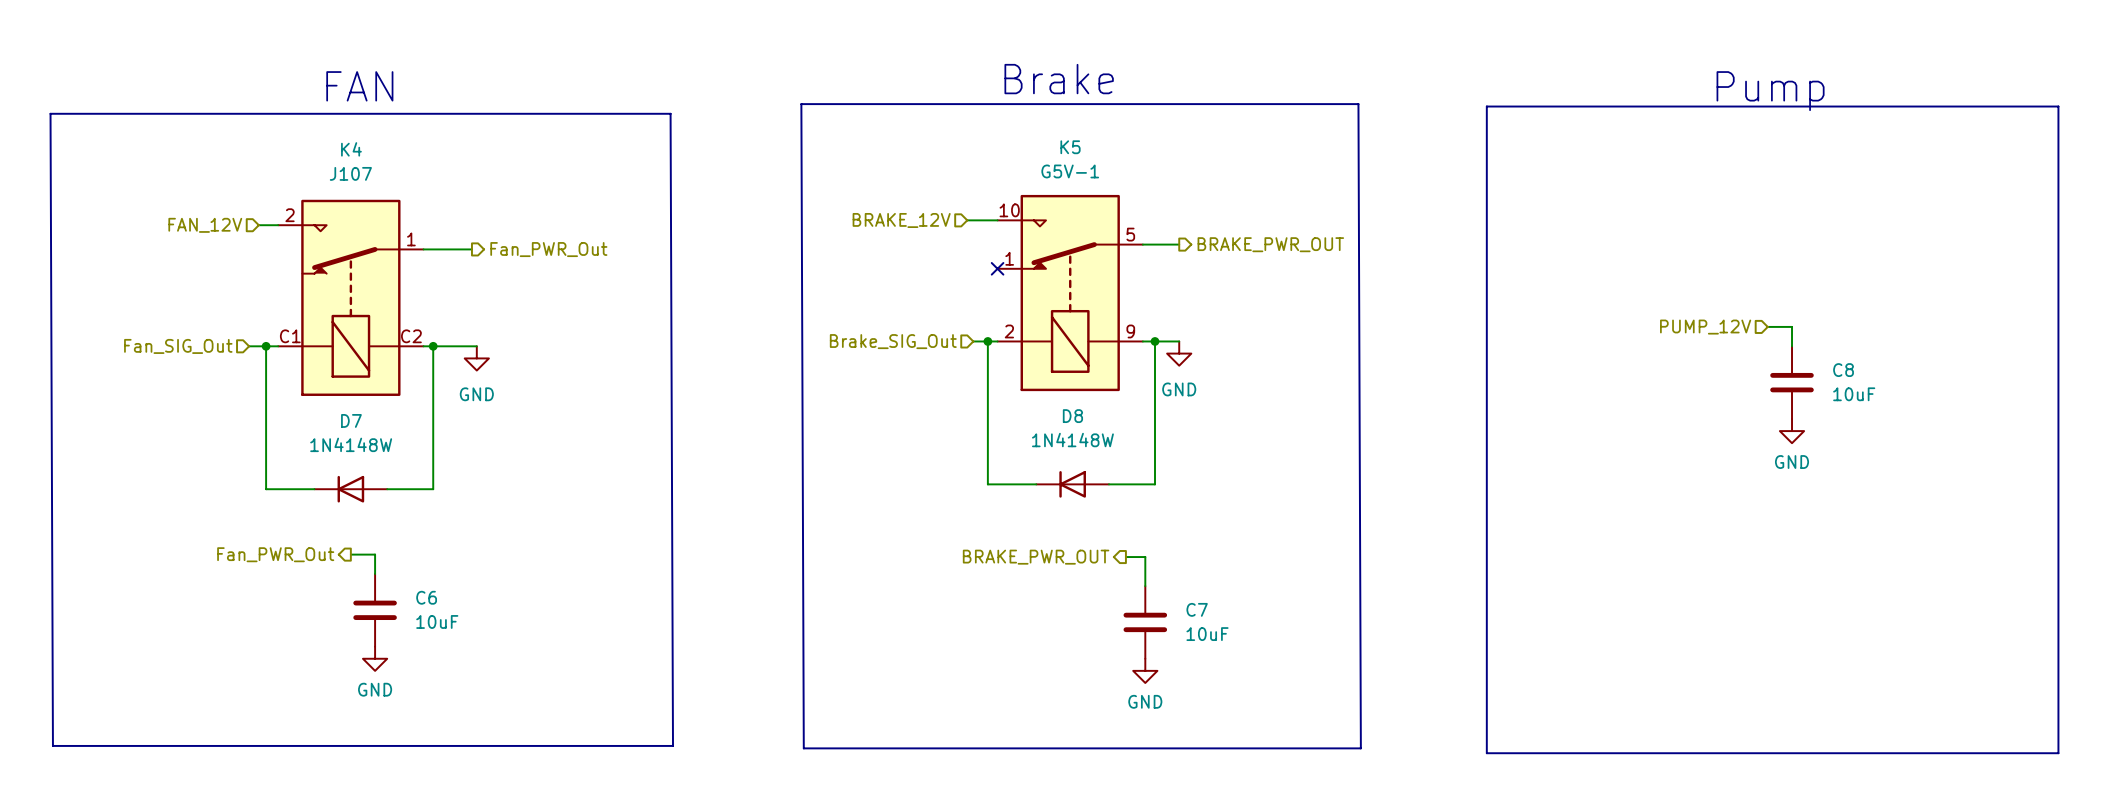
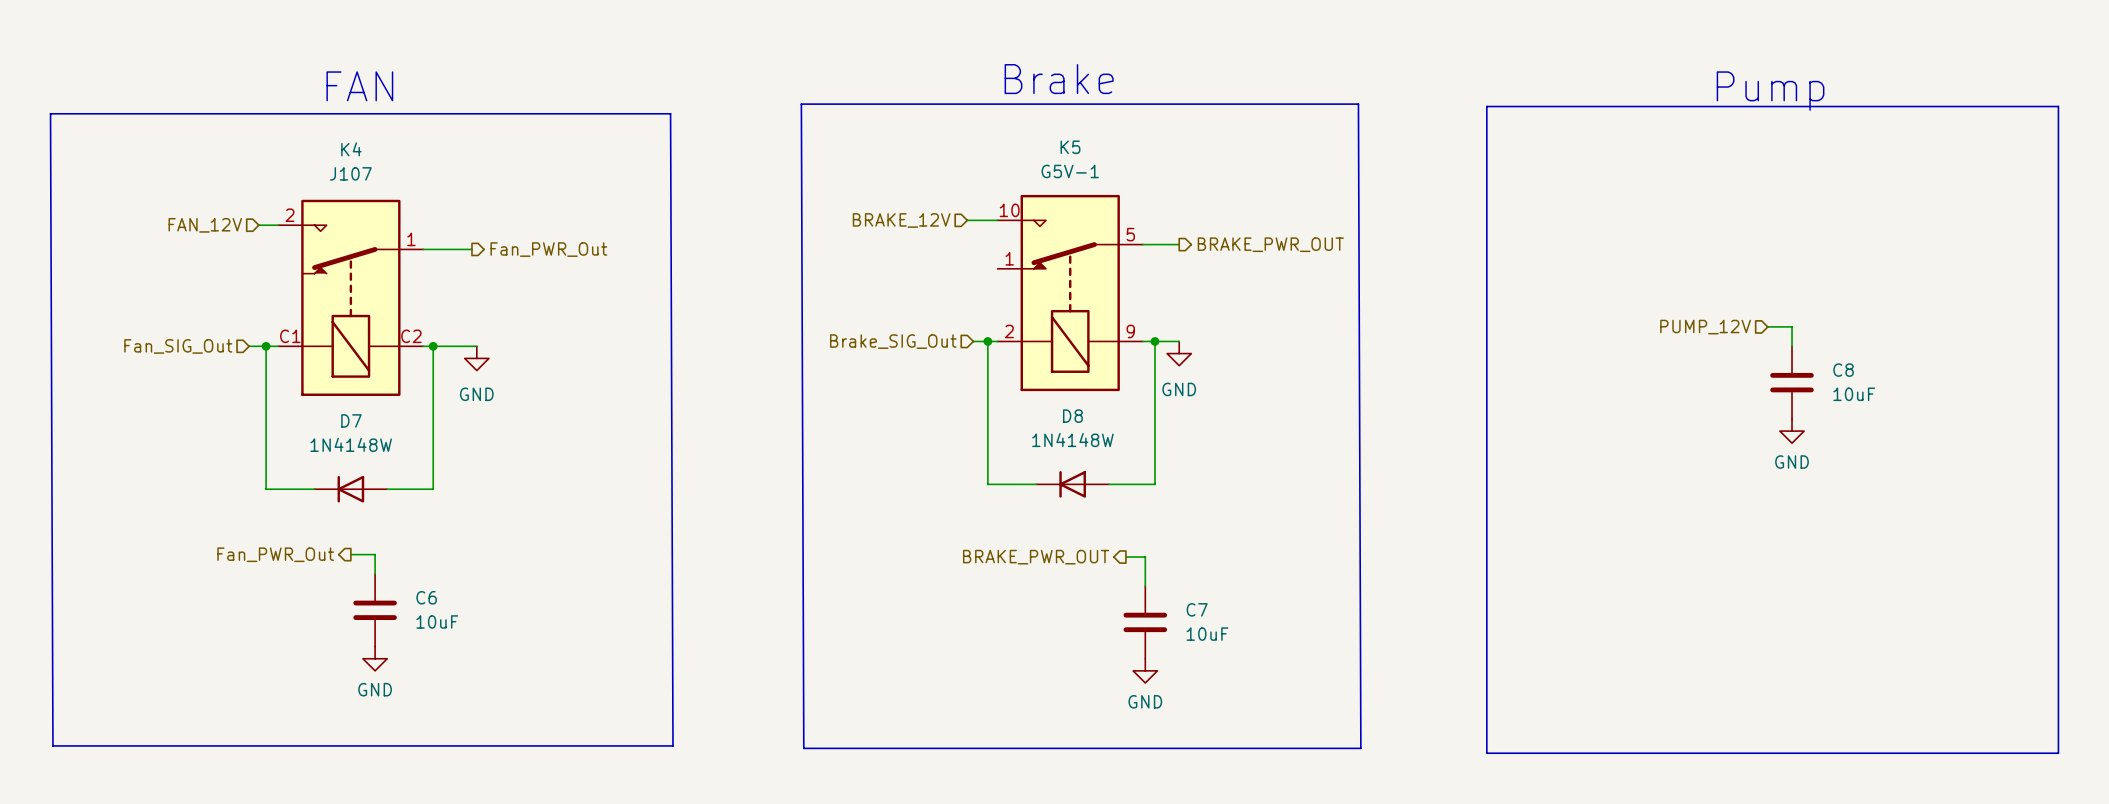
no-connect mark: (997, 268) -> none

